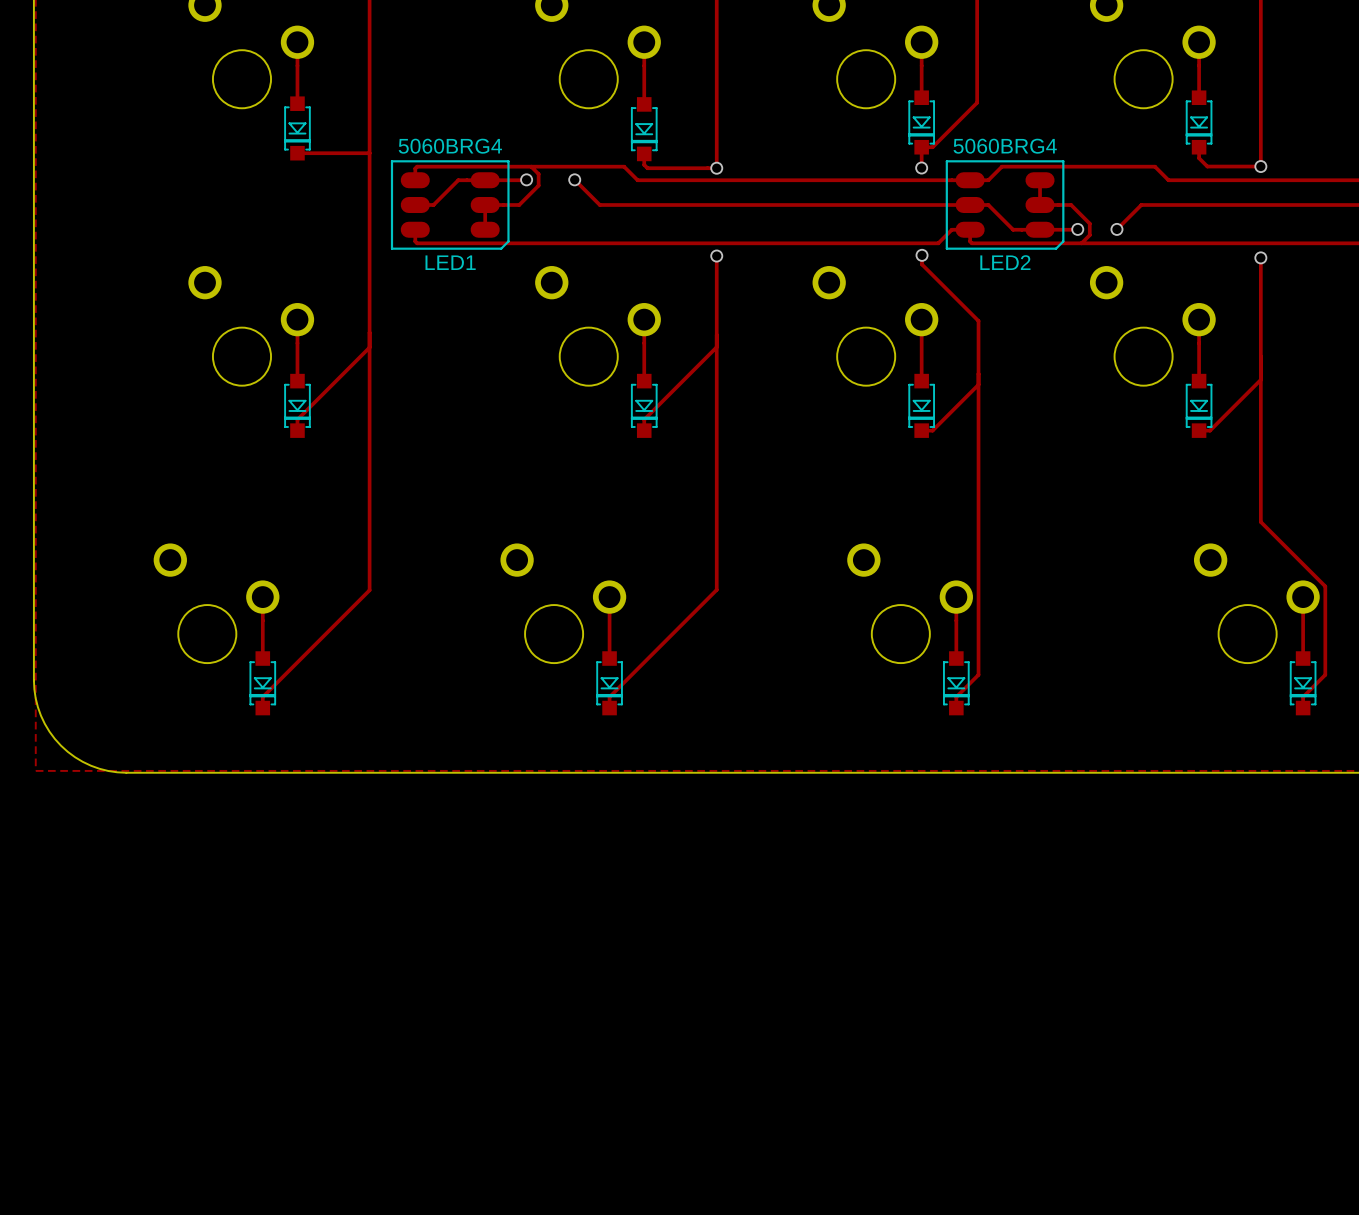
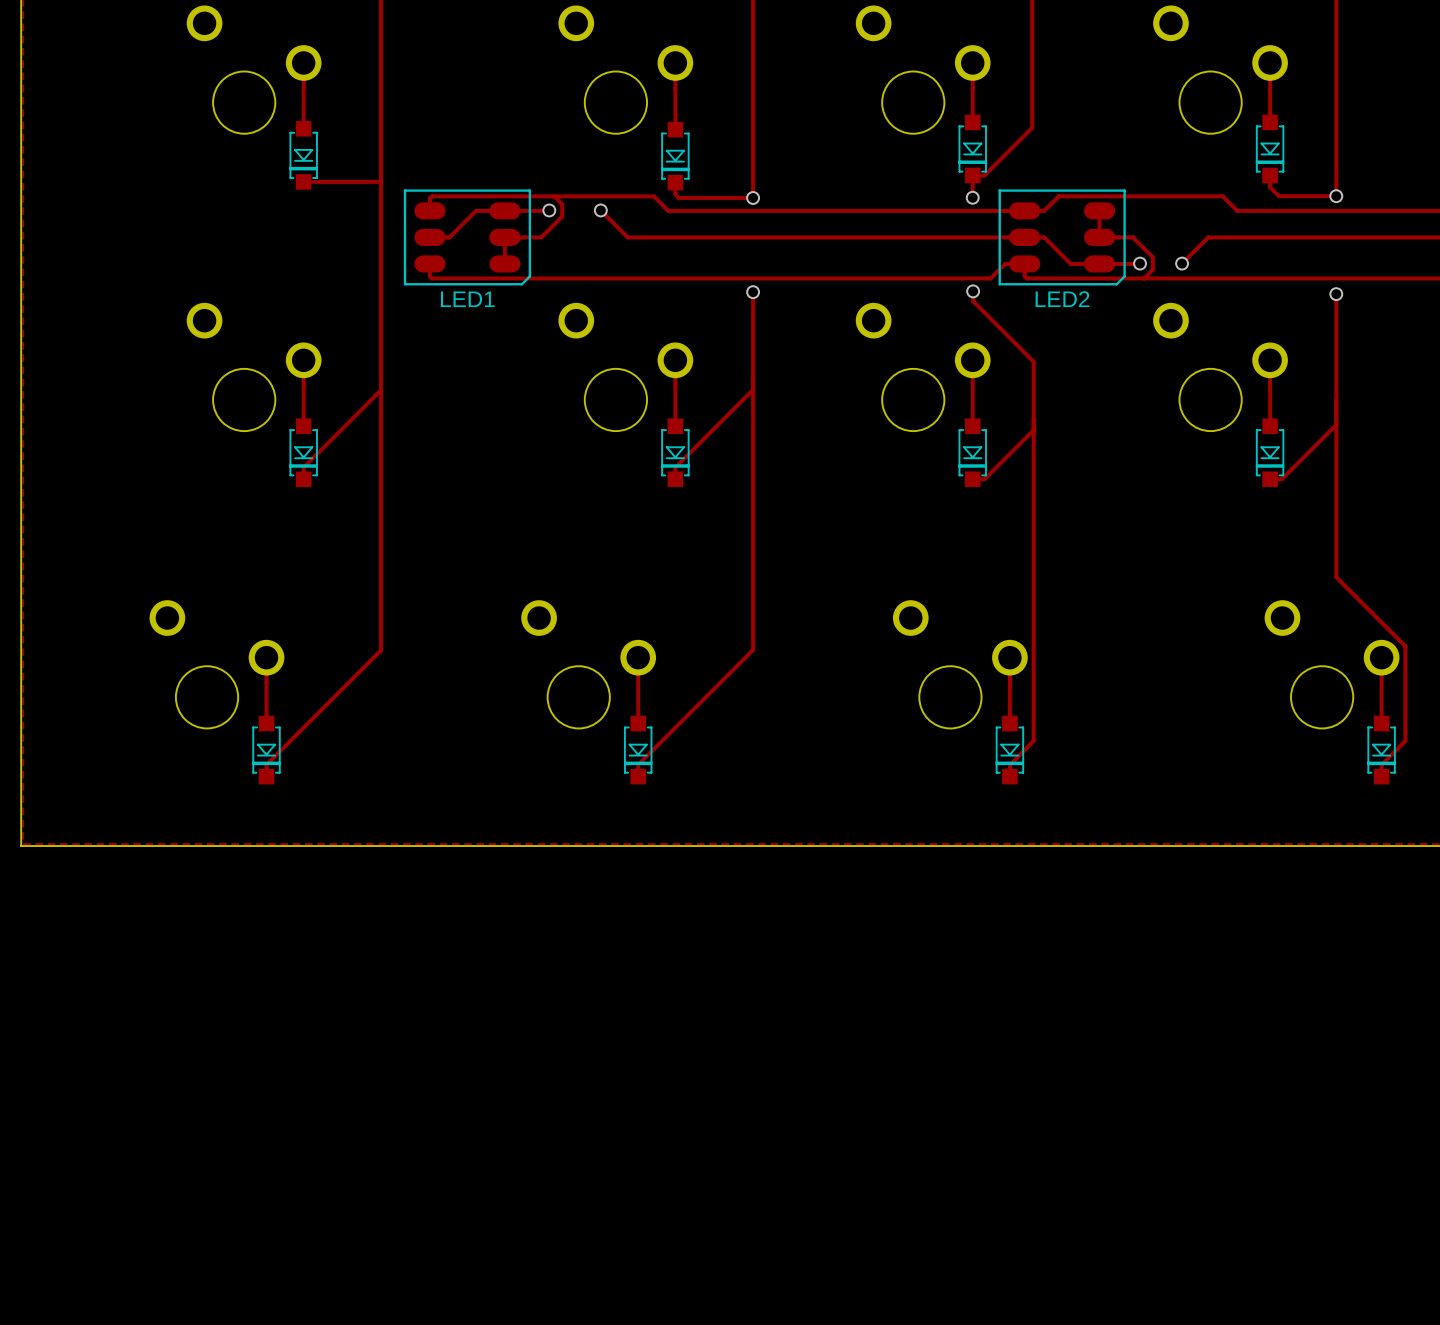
LED1 value: 5060BRG4 (450, 146) -> none
LED2 value: 5060BRG4 (1005, 146) -> none
board edge: (33, 680) (35, 698) (40, 715) (49, 731) (61, 745) (75, 757) (91, 765) (108, 771) (126, 772) -> (21, 746) (21, 846) (120, 846)

